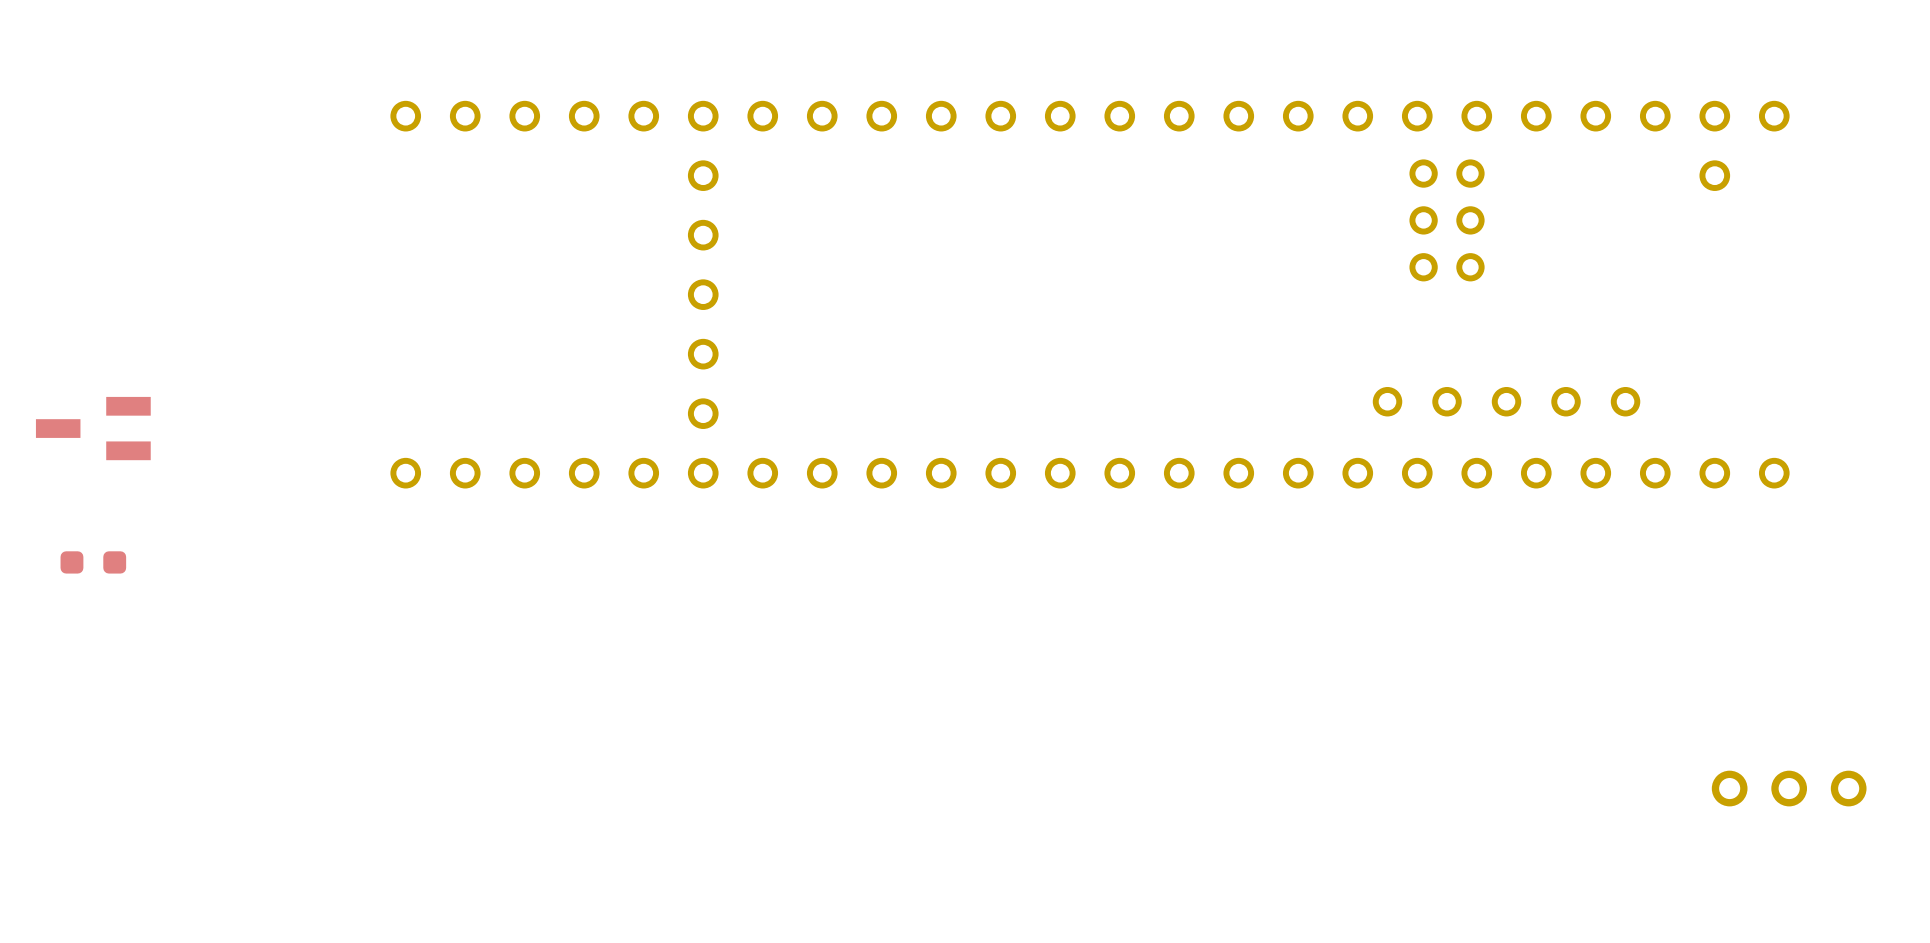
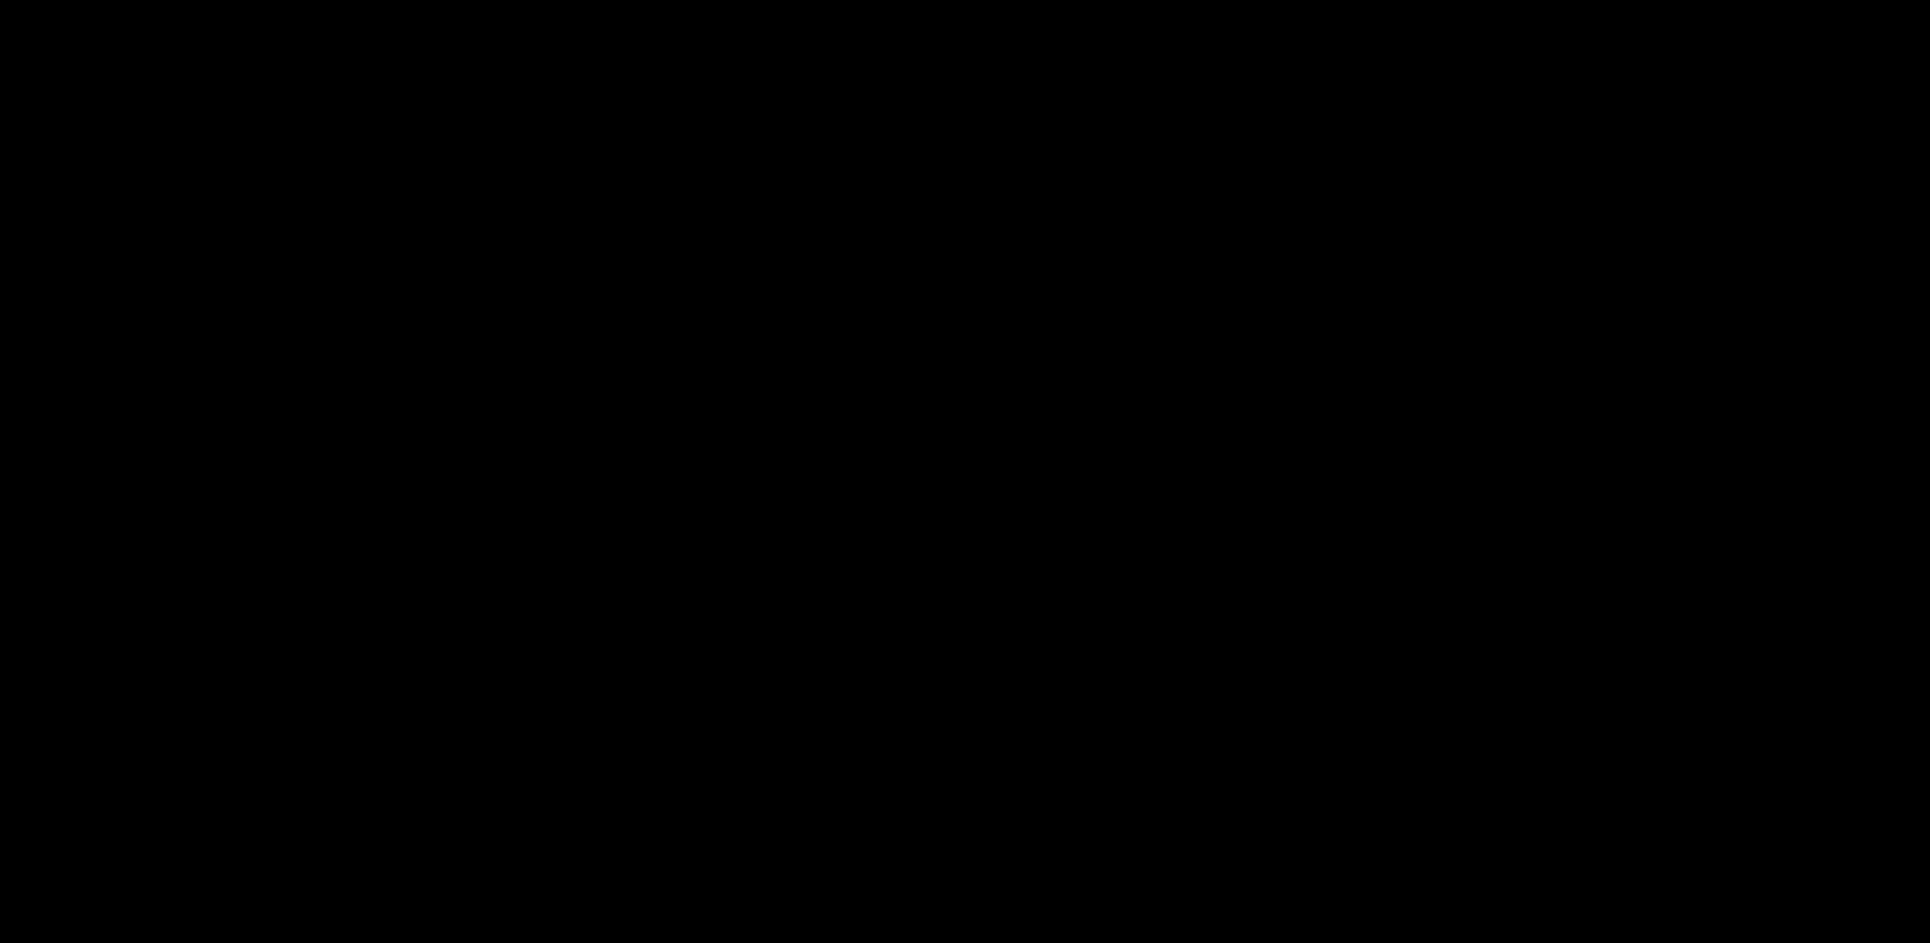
part: (1090, 294) -> none
part: (93, 428) -> none
part: (93, 562) -> none
part: (1789, 788) -> none

